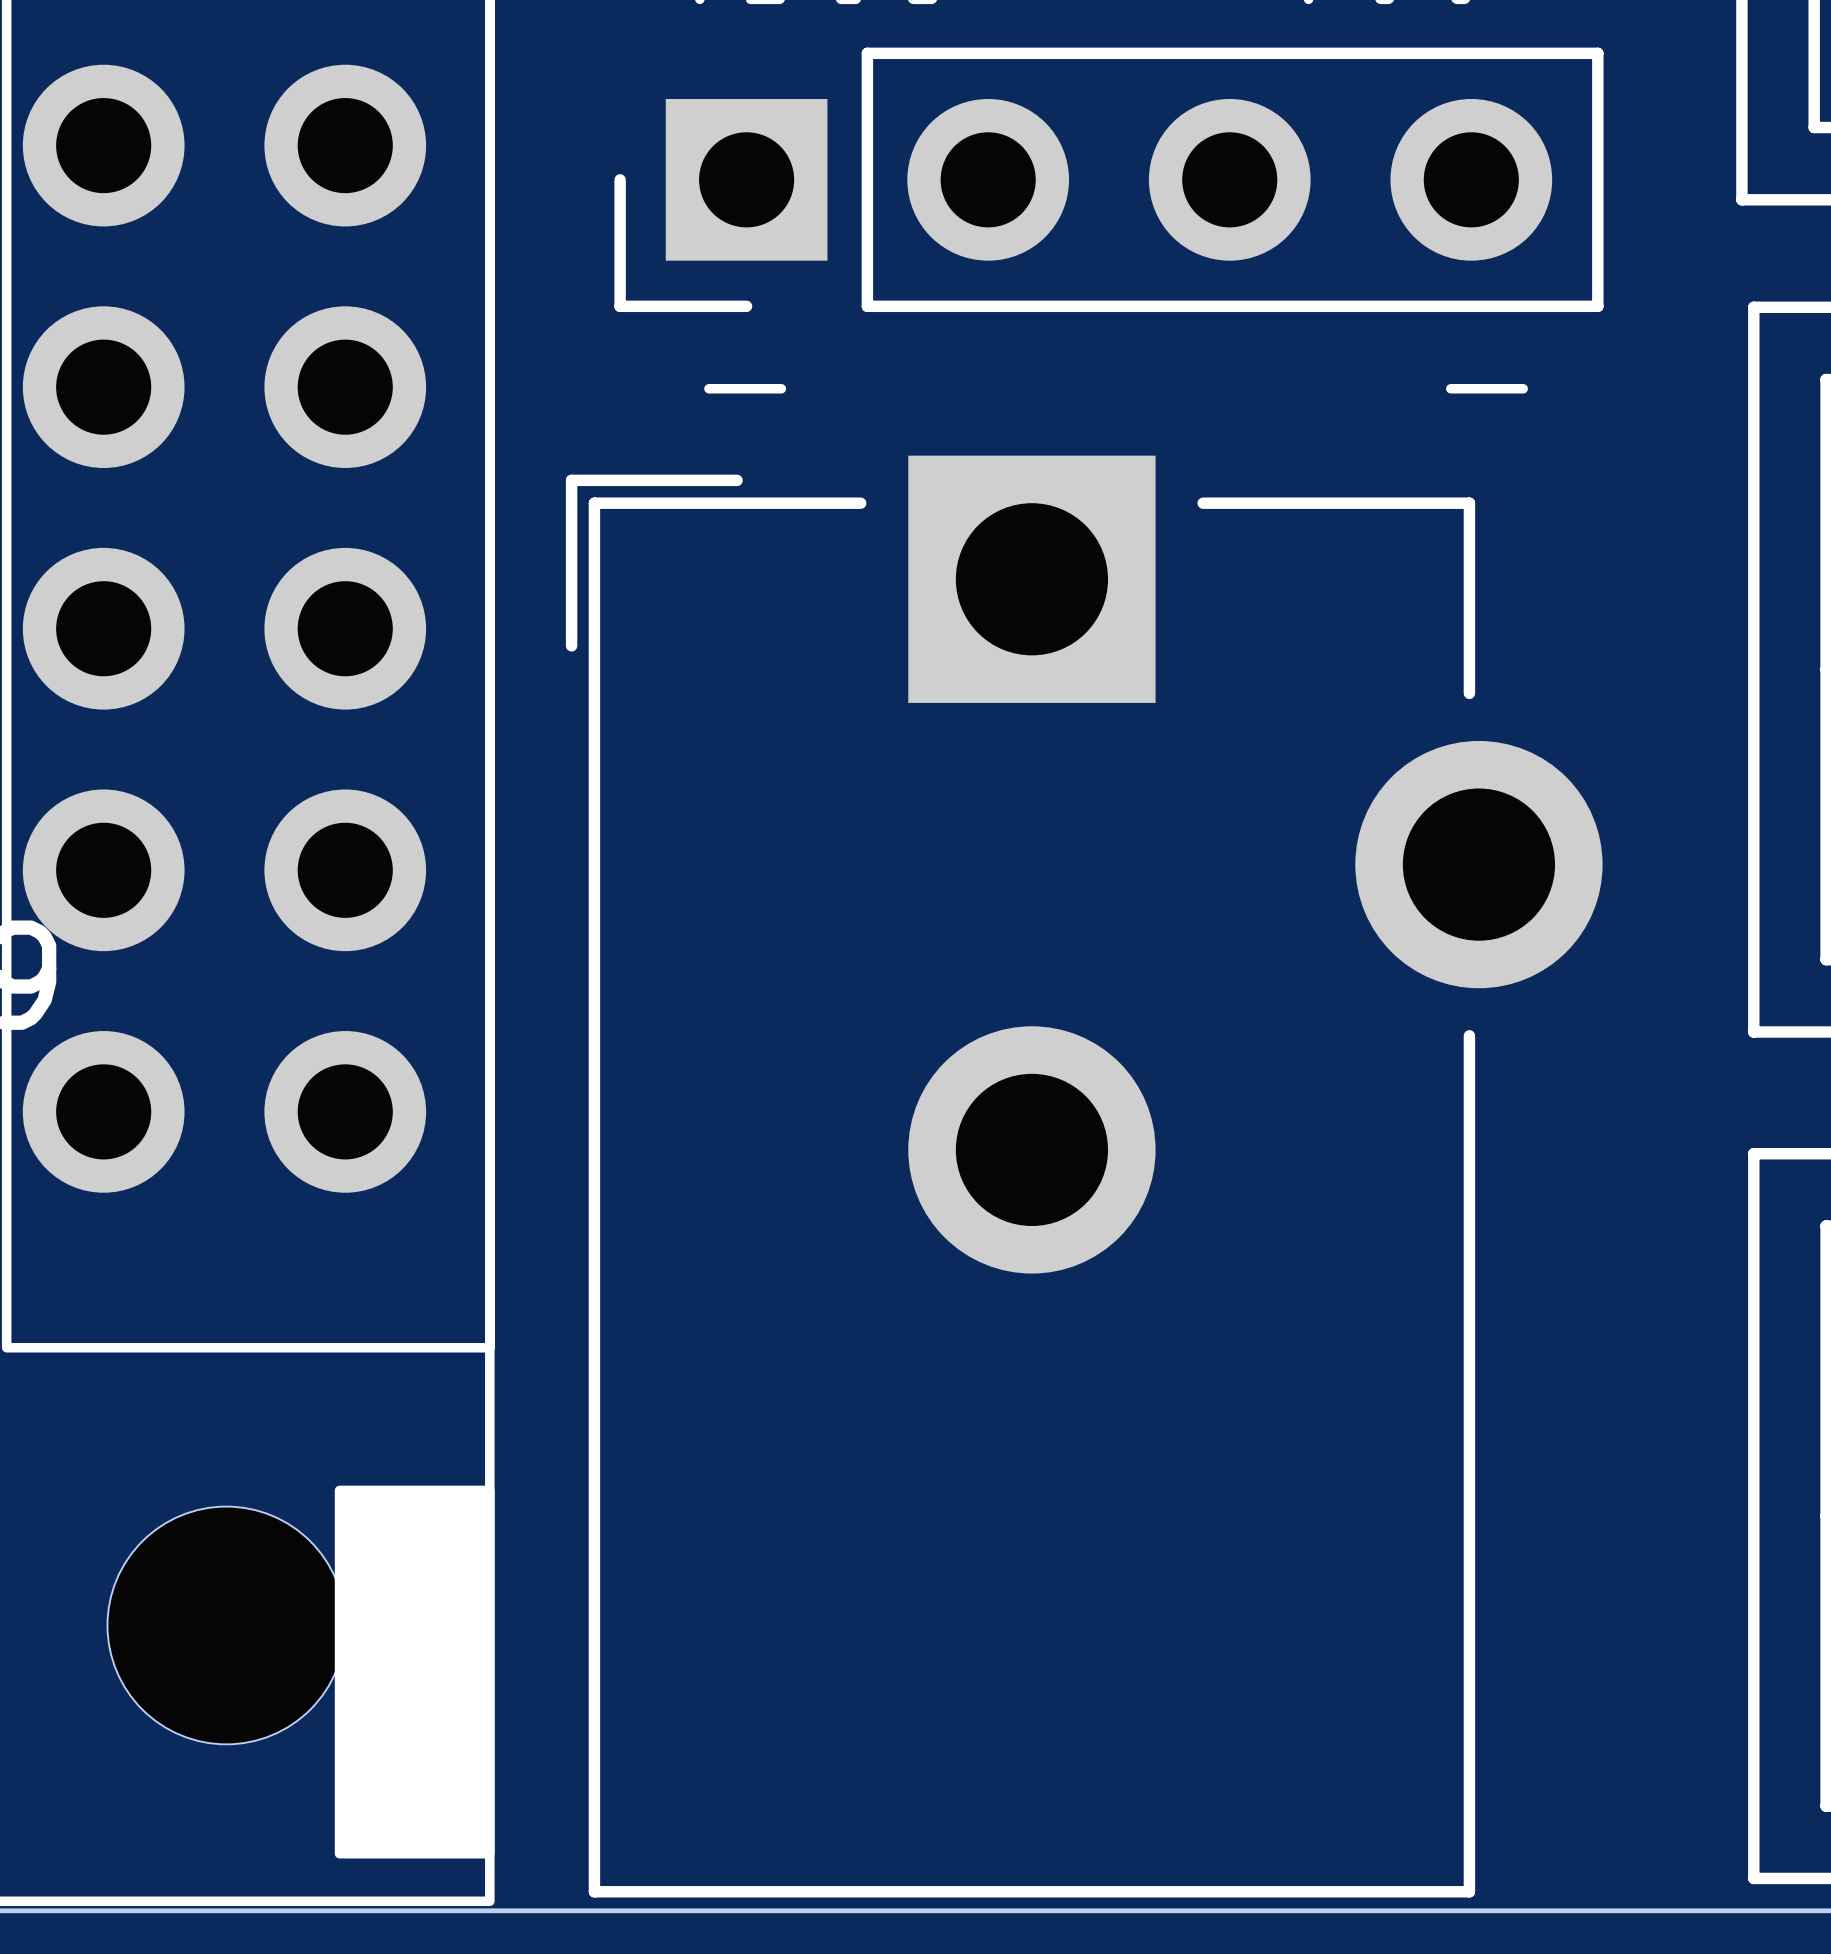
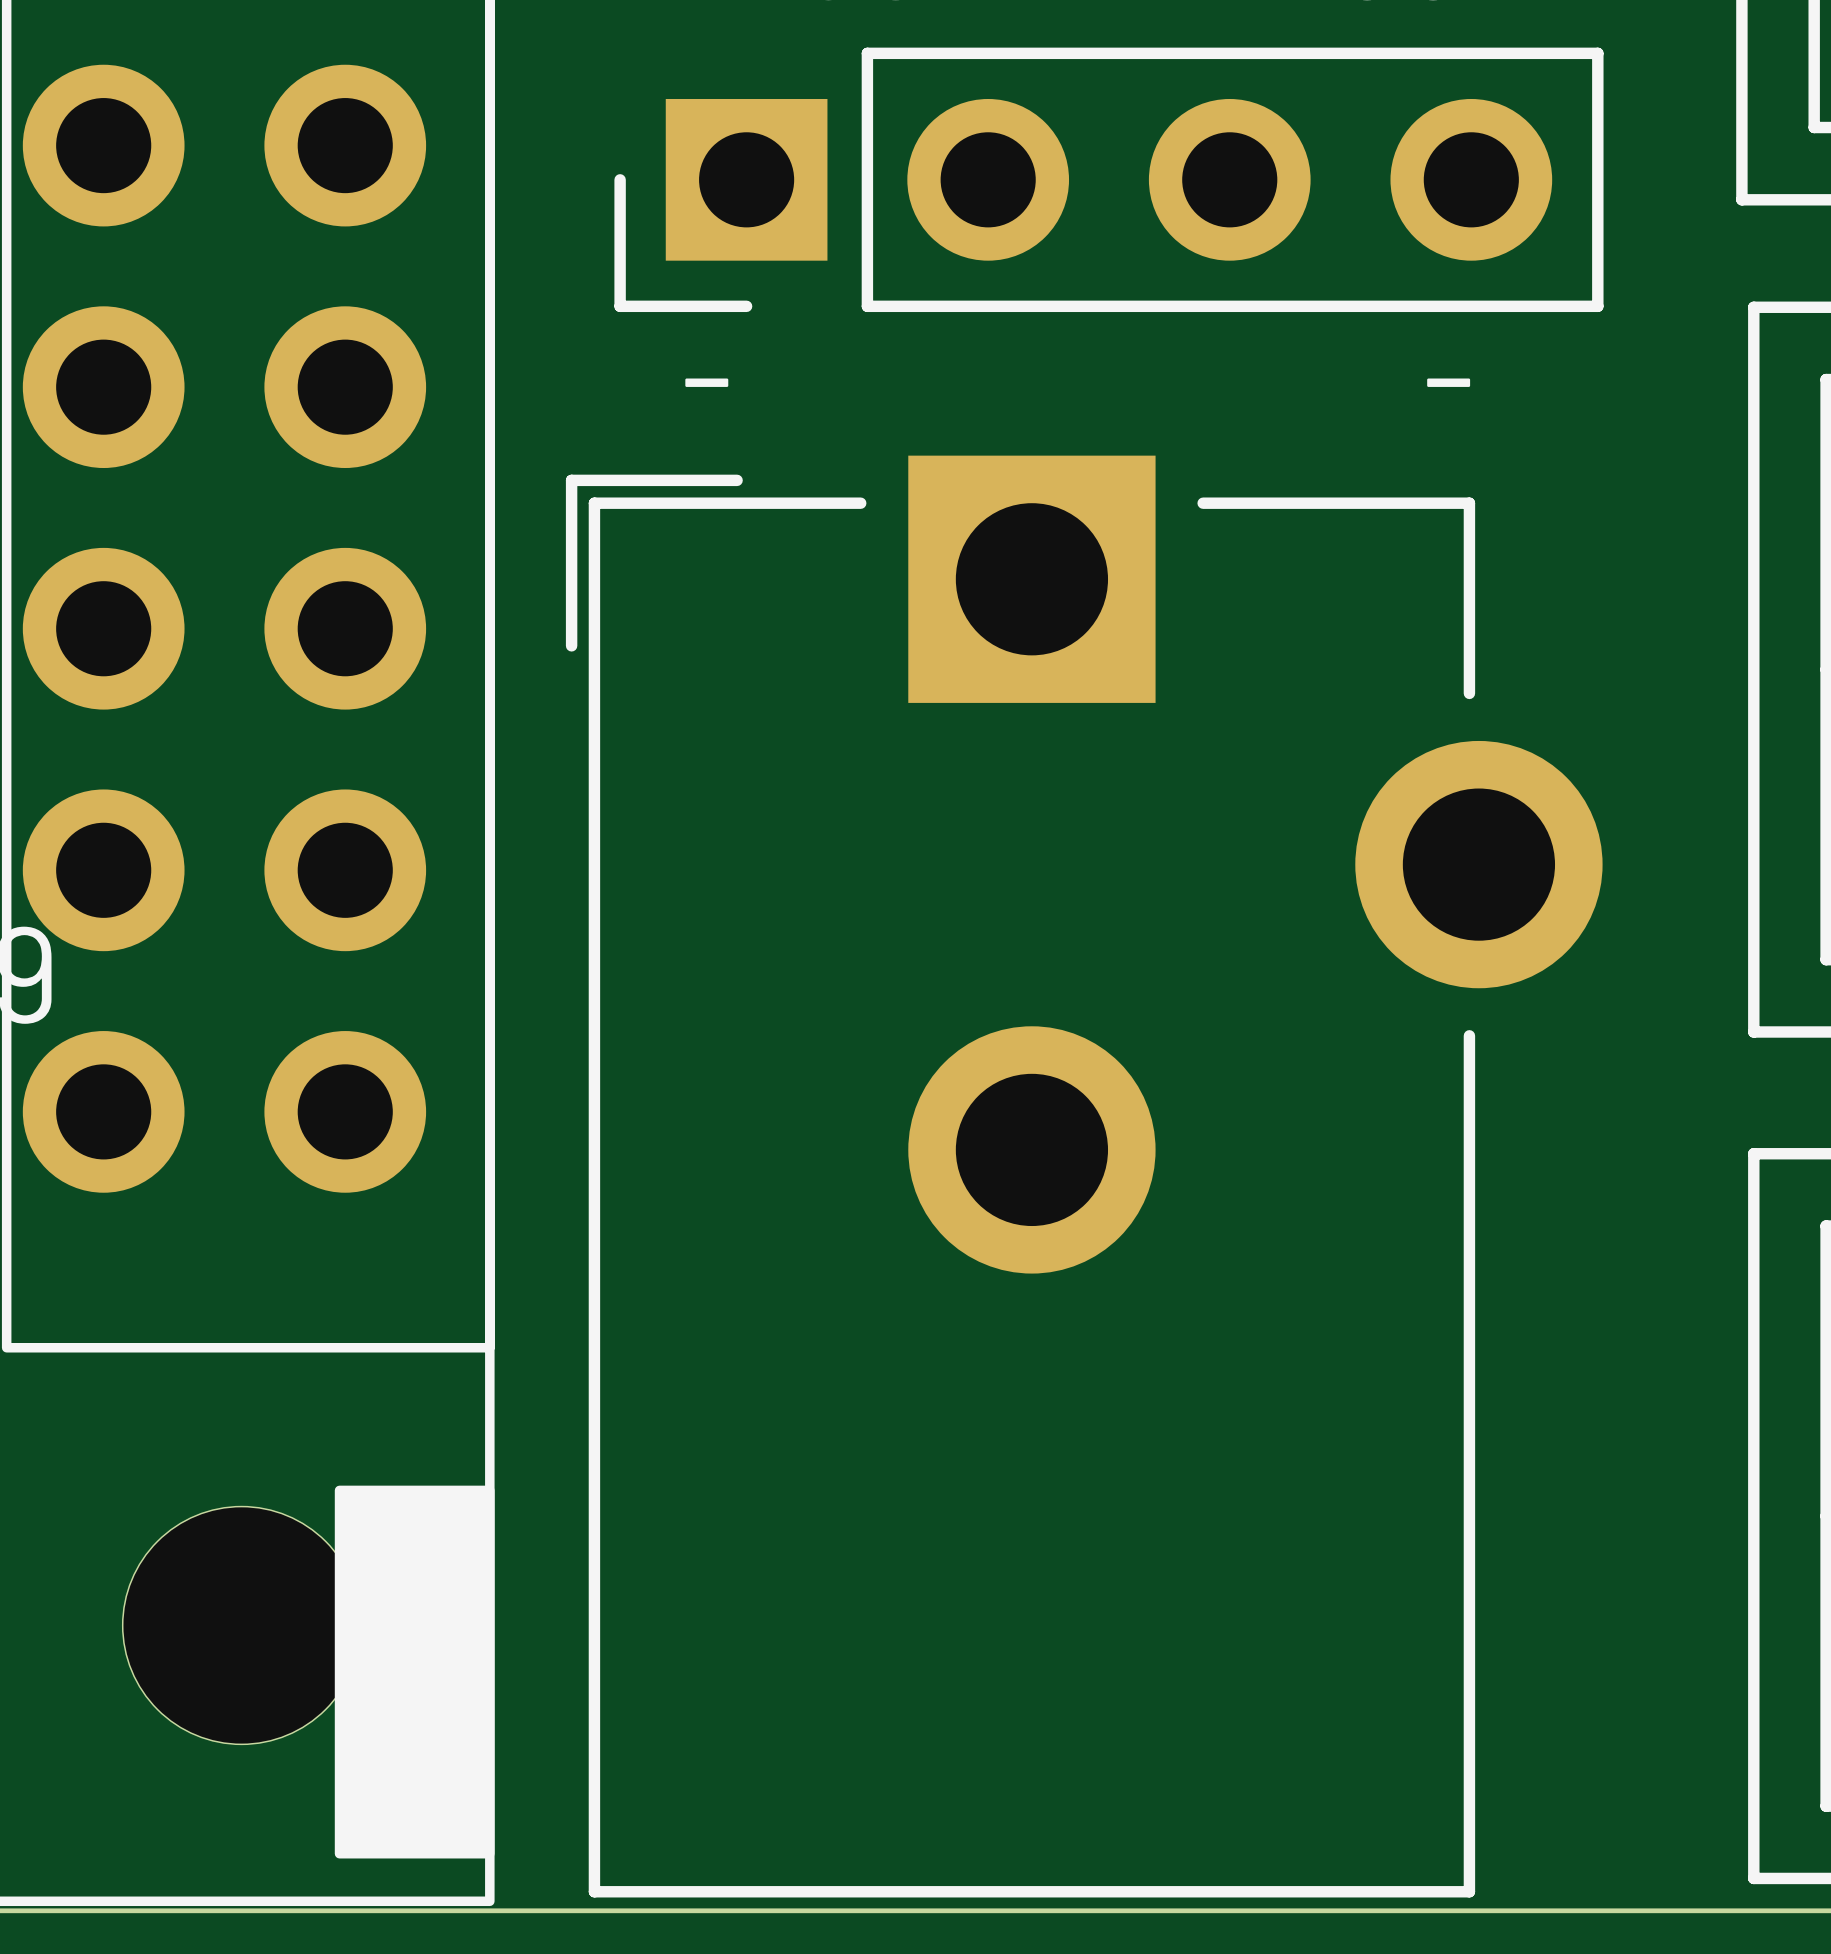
part position: (226, 1625) -> (241, 1625)

